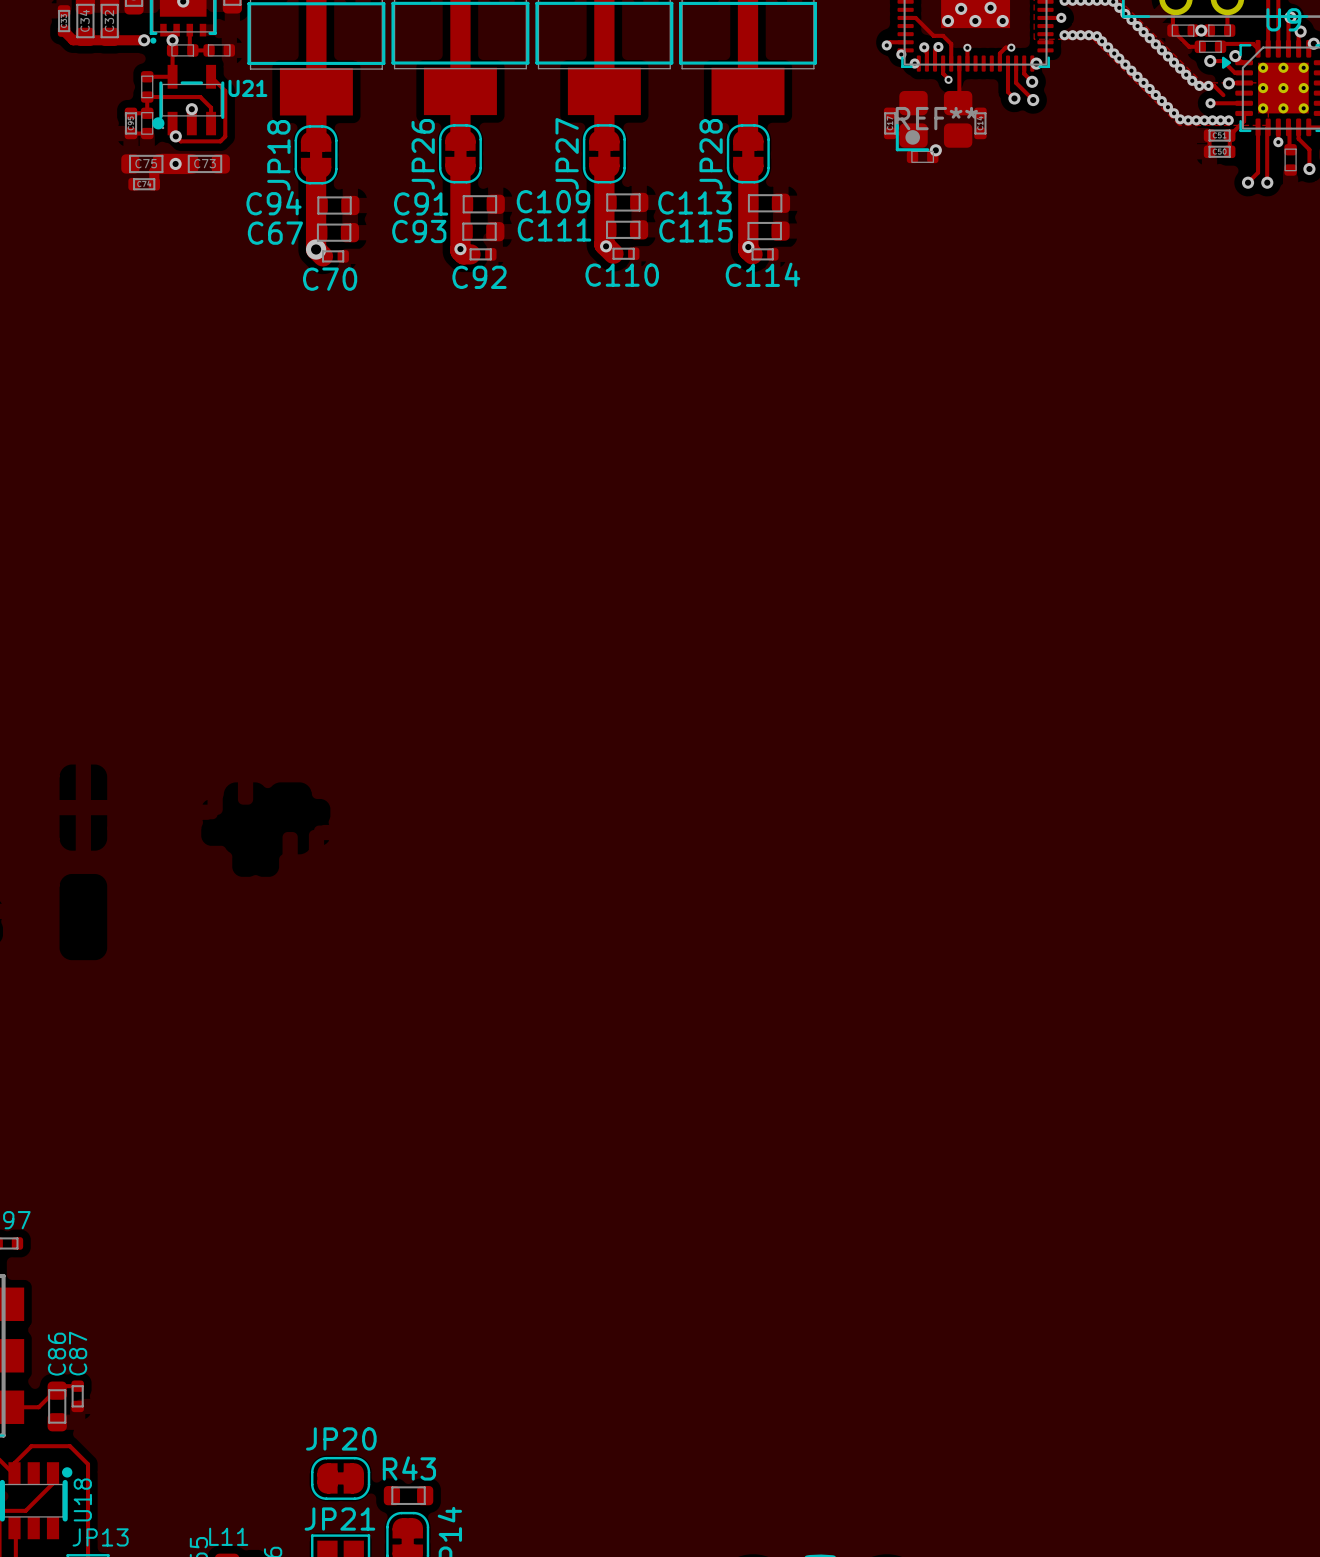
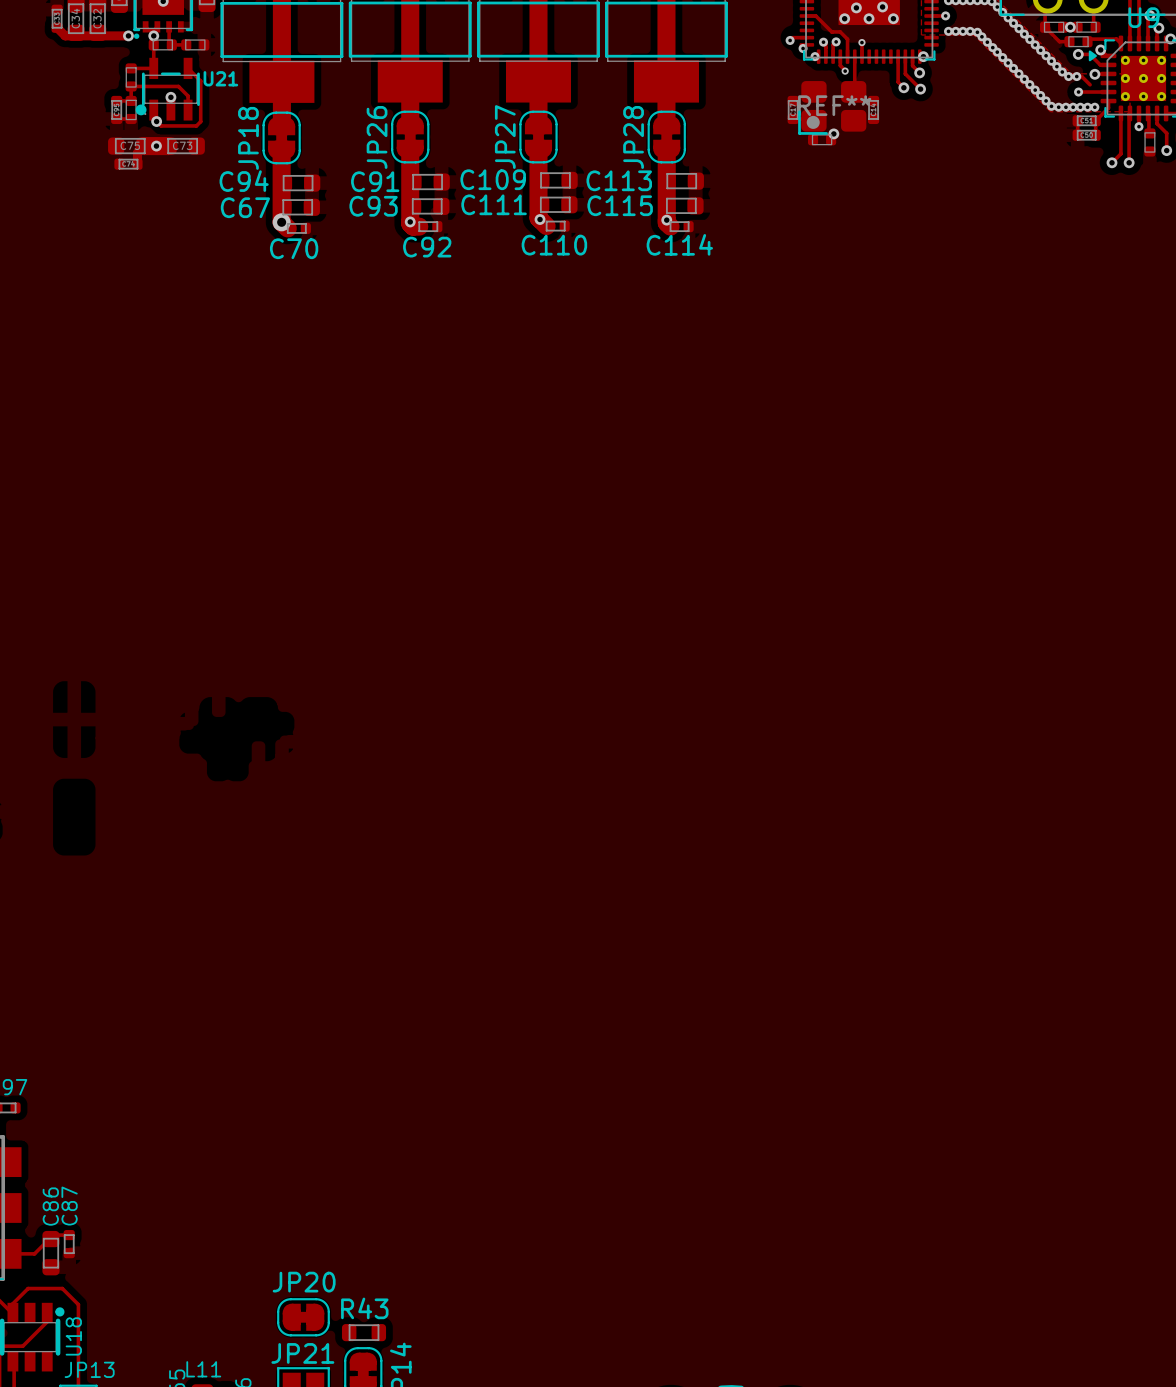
track: (1011, 47) (1005, 47) (999, 53) (999, 63) -> none
via: (1011, 47) -> none

